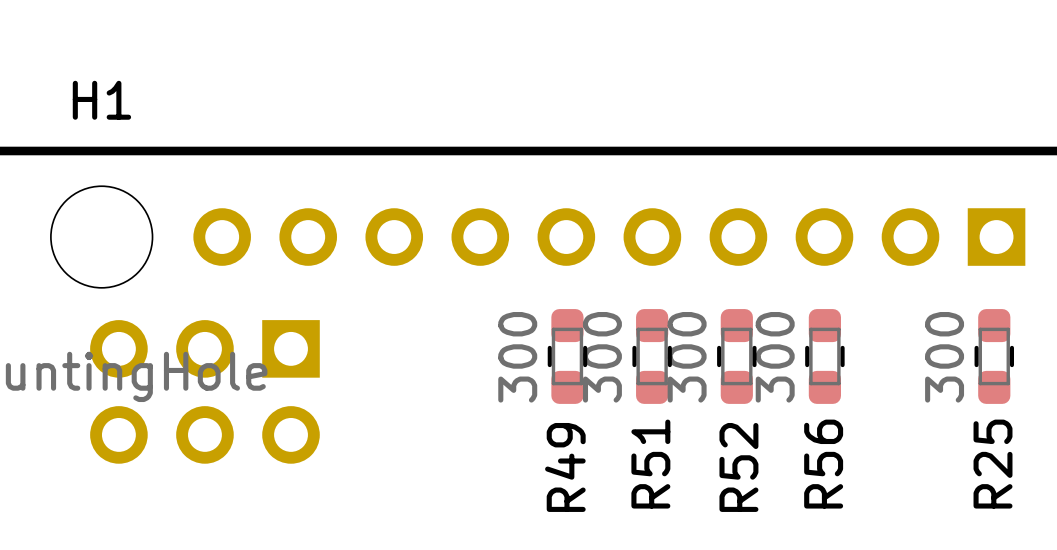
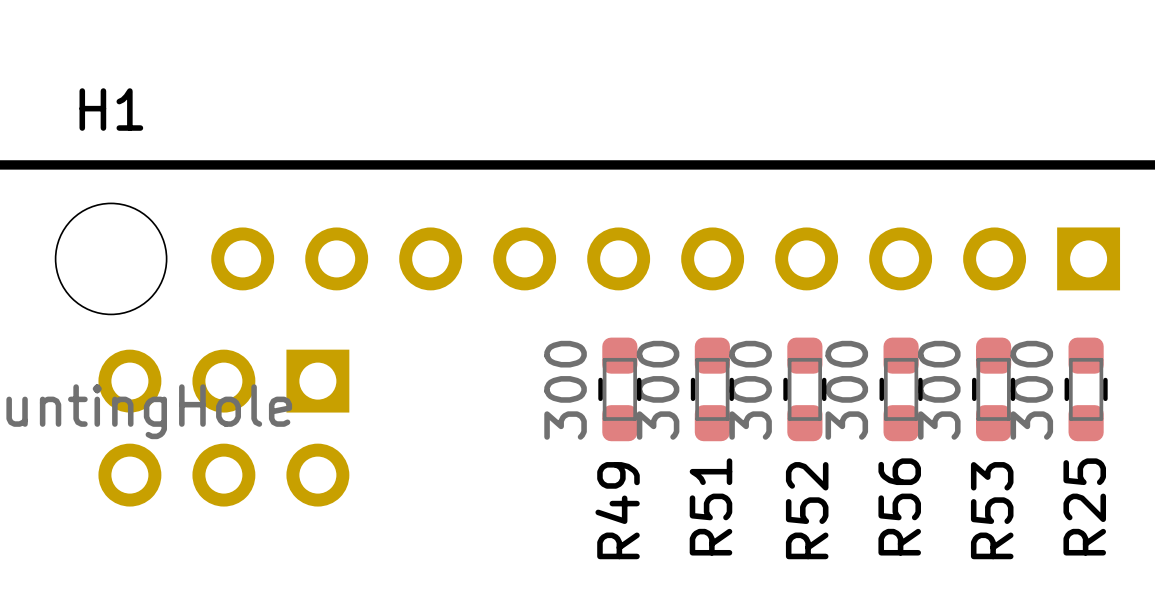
R53: none -> 300 (993, 389)

